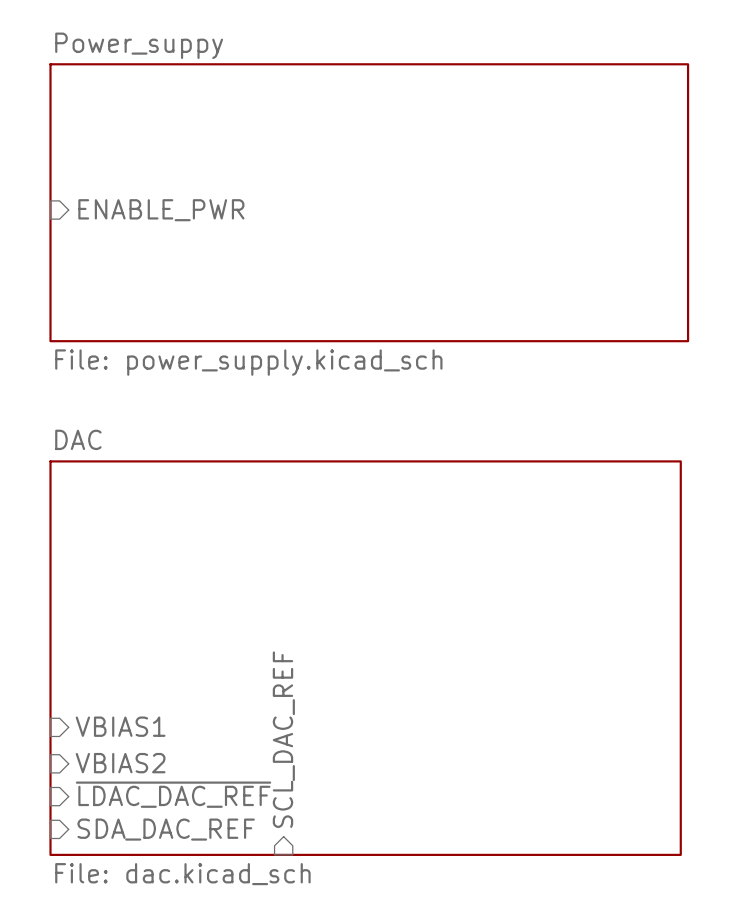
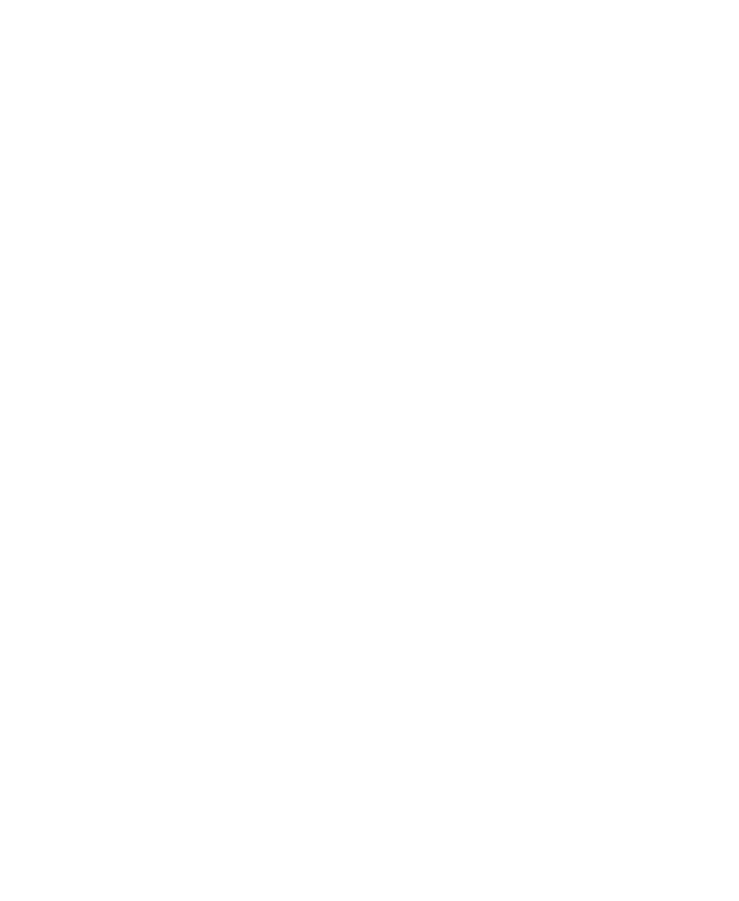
sheet Power_suppy: File: power_supply.kicad_sch (369, 202) -> none
sheet pin: ENABLE_PWR (161, 210) -> none
sheet DAC: File: dac.kicad_sch (365, 658) -> none
sheet pin: VBIAS1 (120, 726) -> none
sheet pin: SCL_DAC_REF (283, 739) -> none
sheet pin: VBIAS2 (120, 763) -> none
sheet pin: ~{LDAC_DAC_REF} (173, 794) -> none
sheet pin: SDA_DAC_REF (166, 829) -> none

